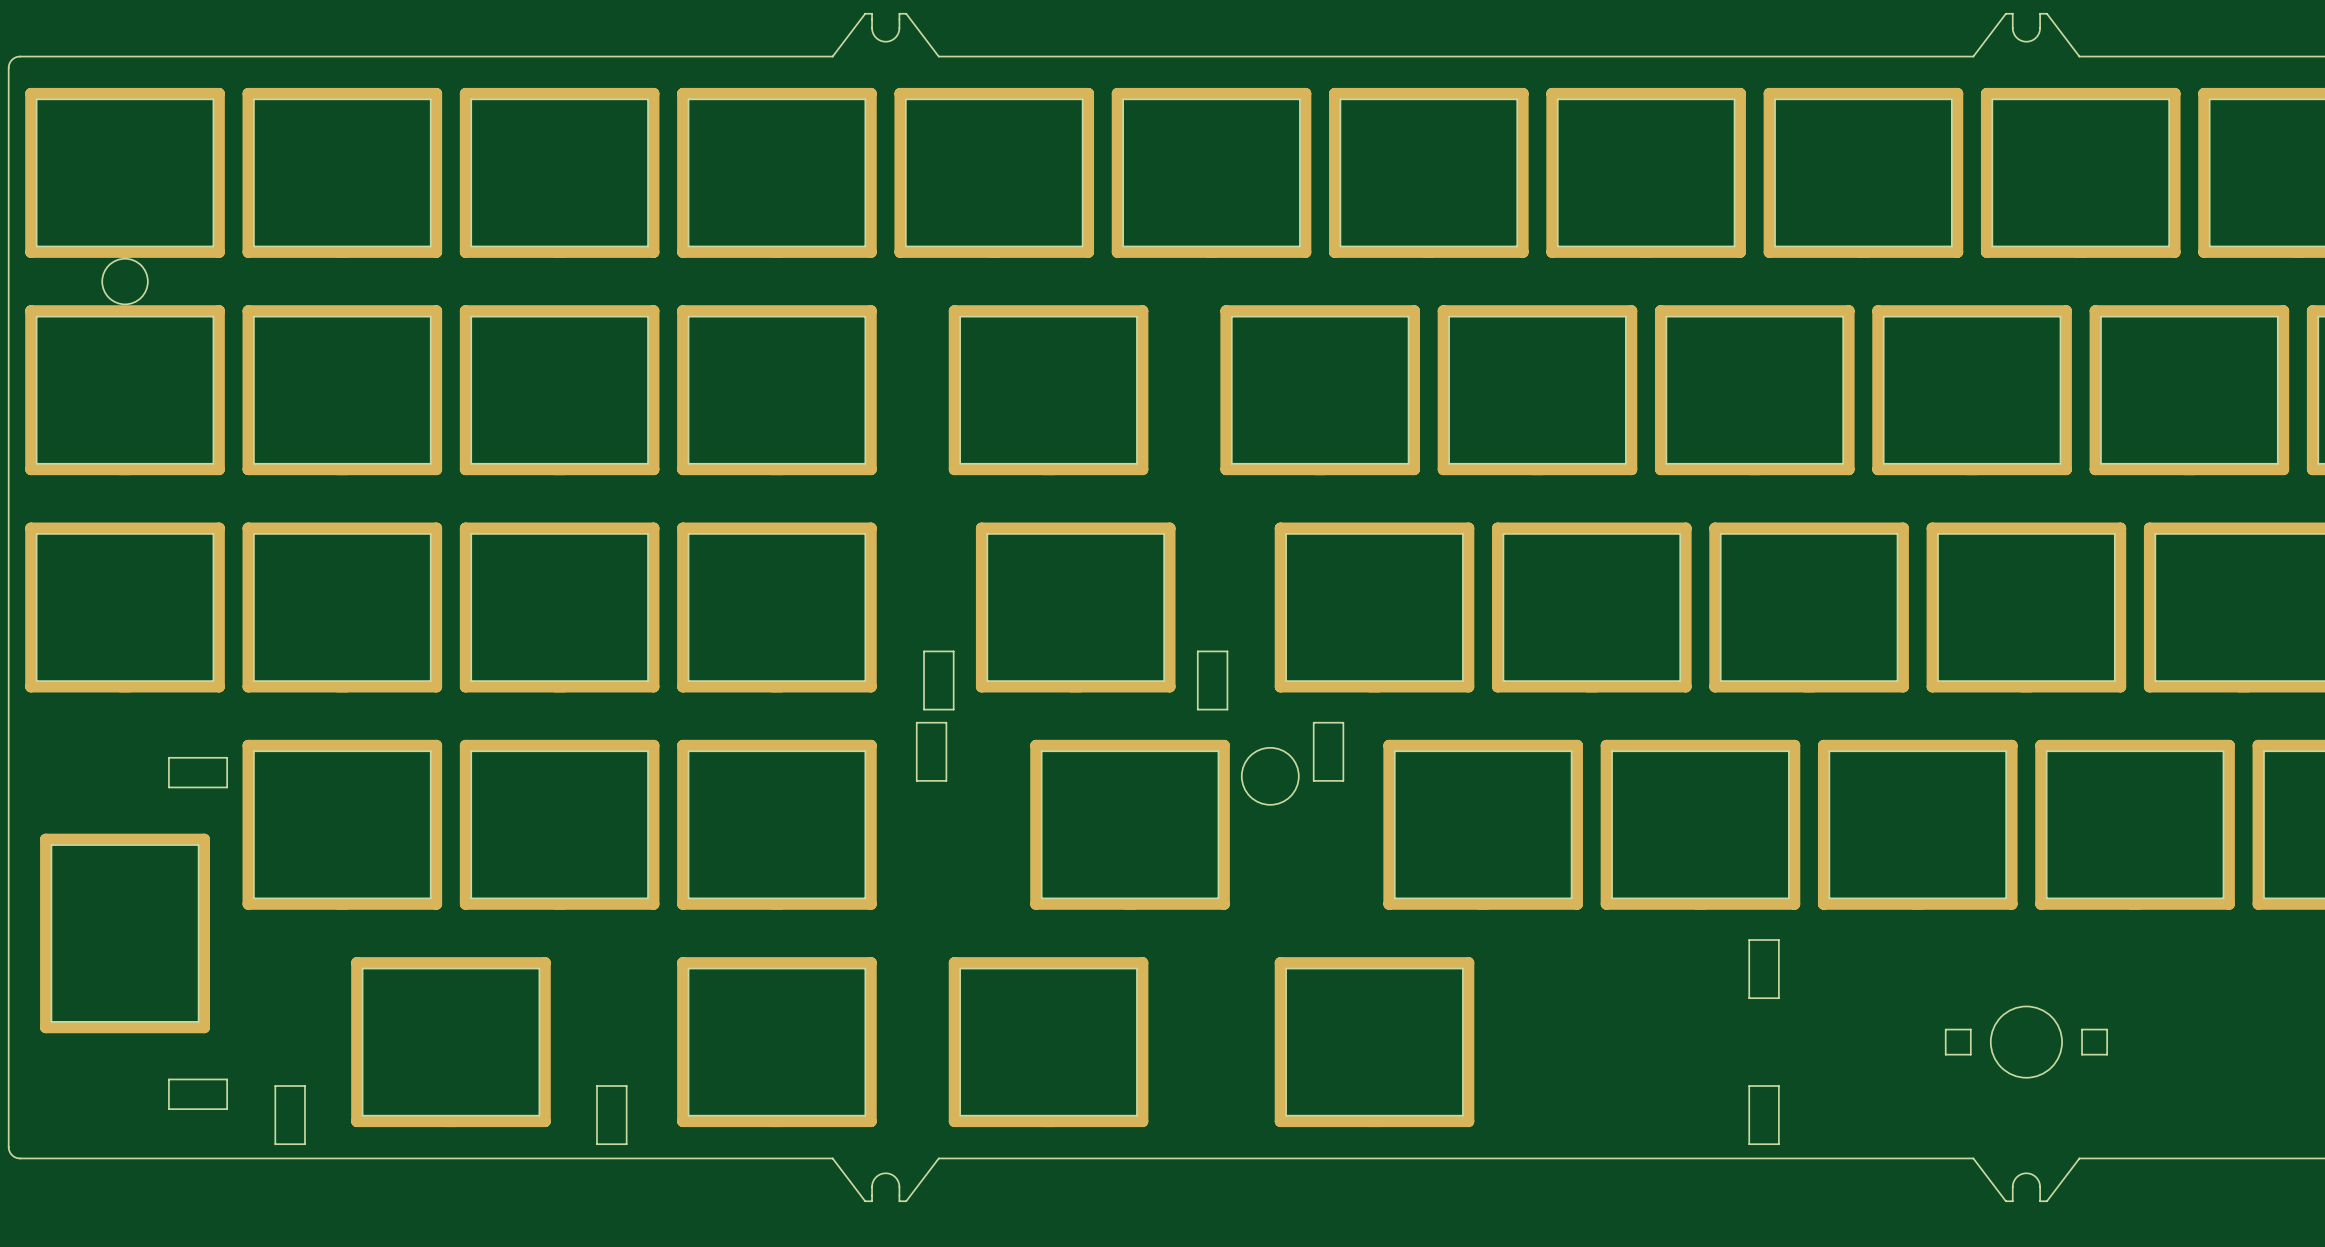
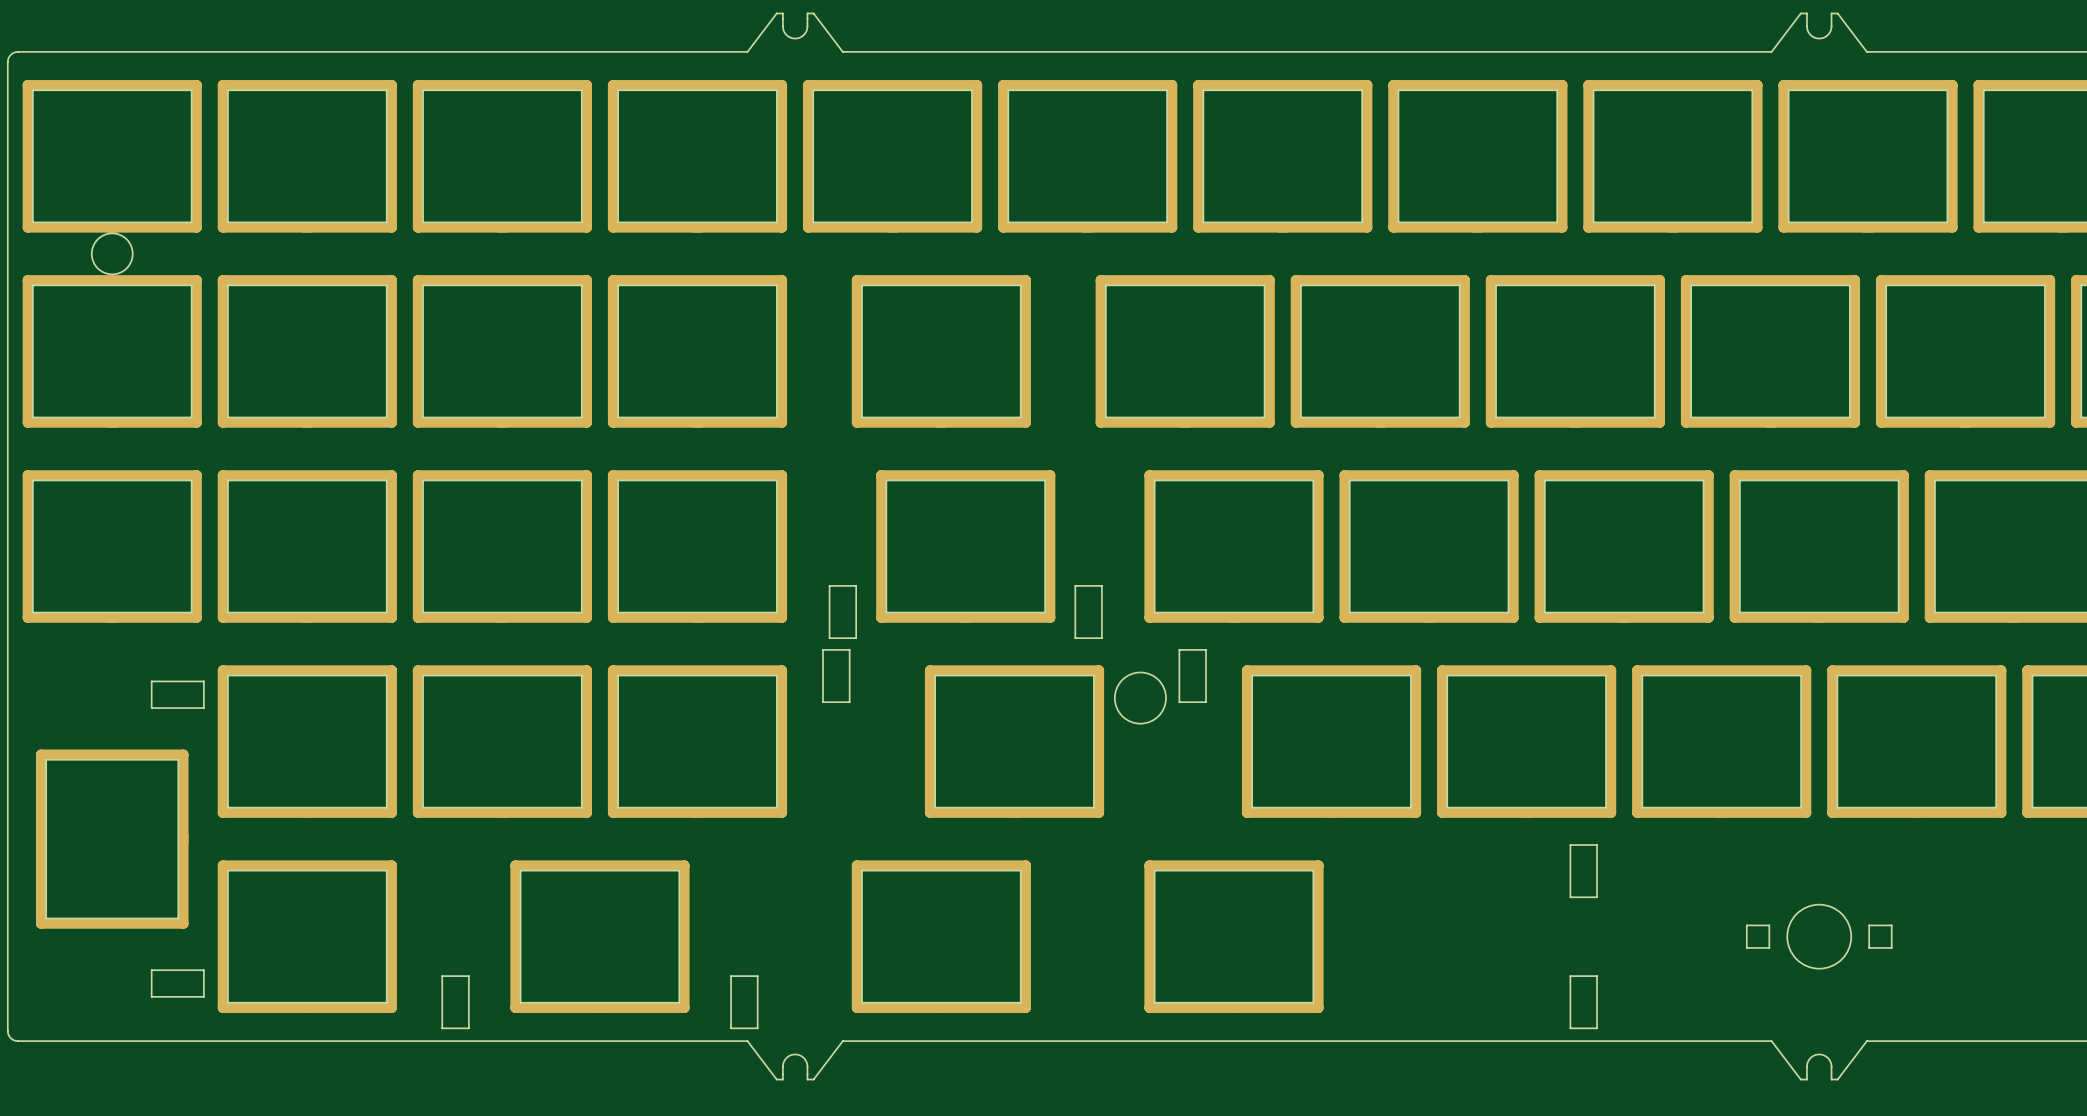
part: none -> (307, 936)
part: (450, 1042) -> none
part: none -> (599, 936)
part: (776, 1042) -> none
board edge: (275, 1086) (275, 1144) (304, 1144) (304, 1086) (275, 1086) -> none
board edge: (596, 1086) (626, 1086) (626, 1144) (596, 1144) (596, 1086) -> (442, 976) (468, 976) (468, 1028) (442, 1028) (442, 976)
board edge: none -> (731, 976) (757, 976) (757, 1028) (731, 1028) (731, 976)

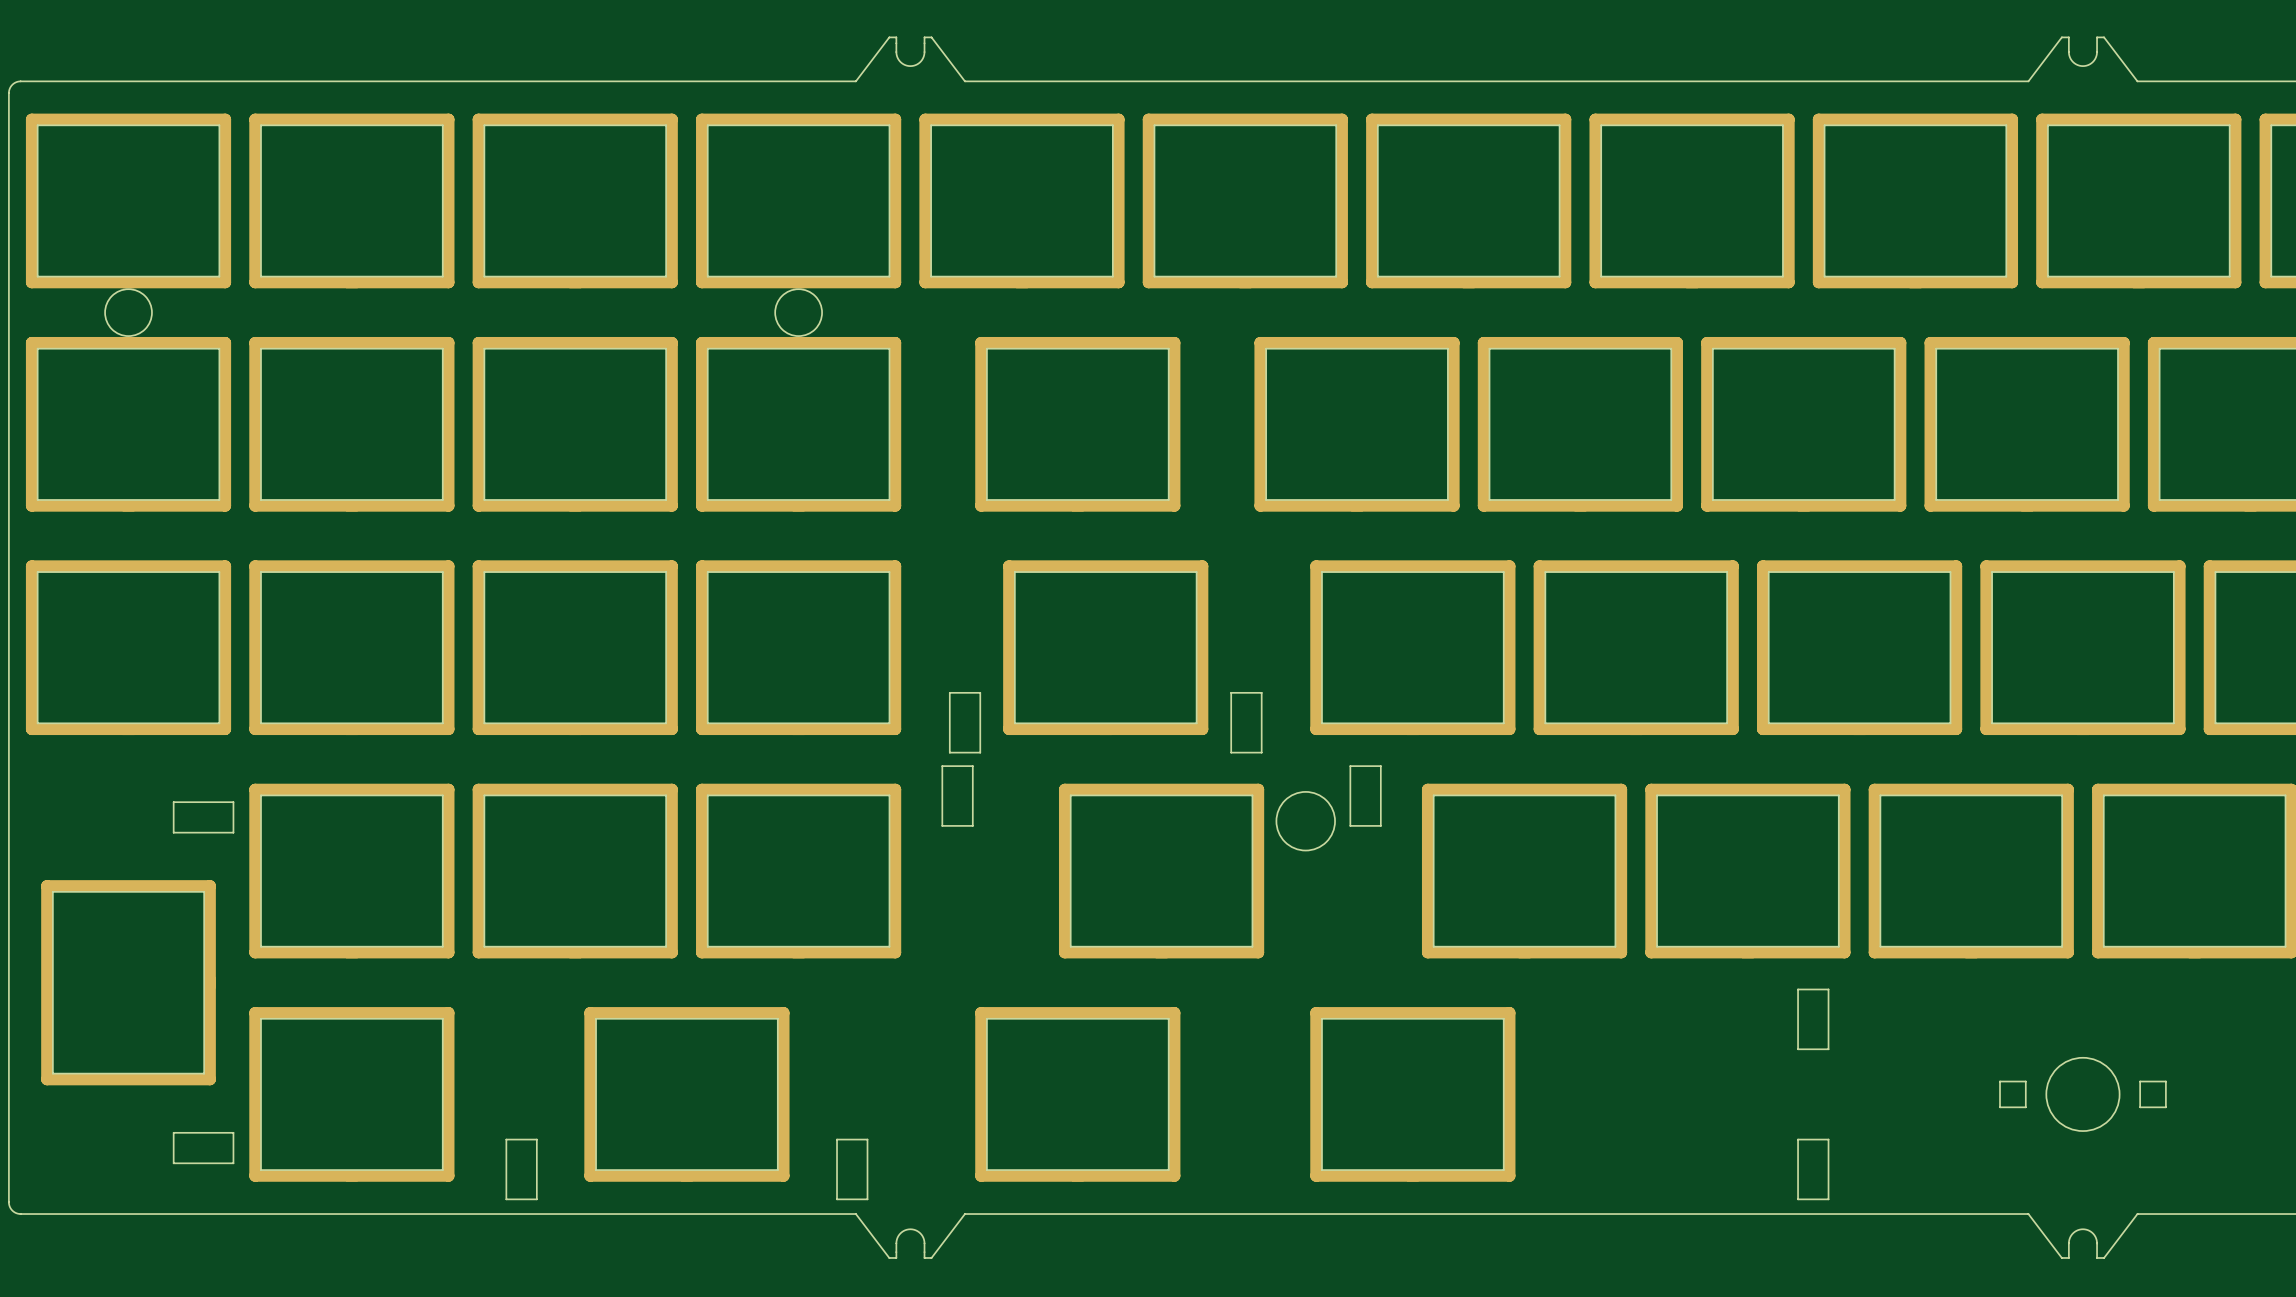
round board edge: none -> [774, 288, 823, 337]

